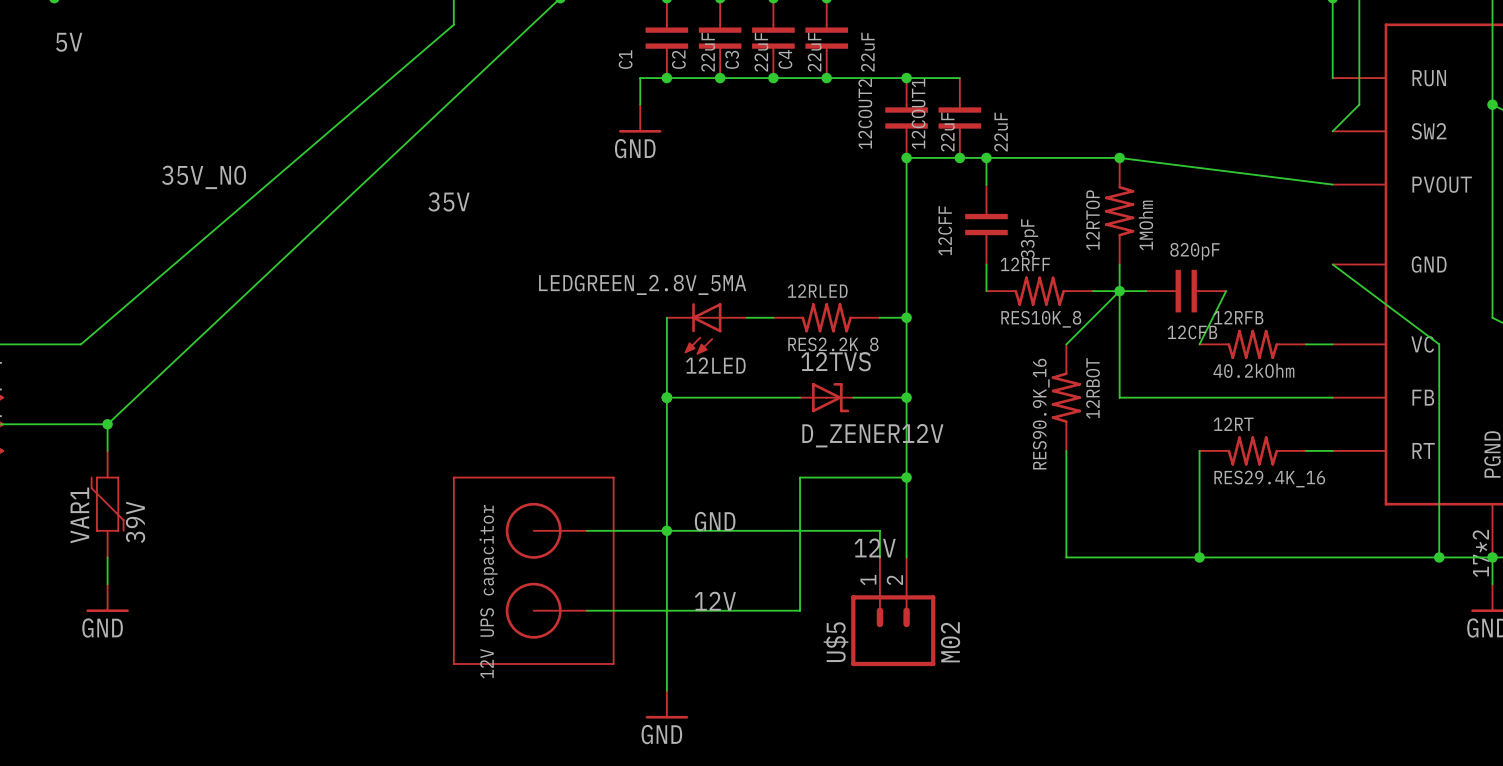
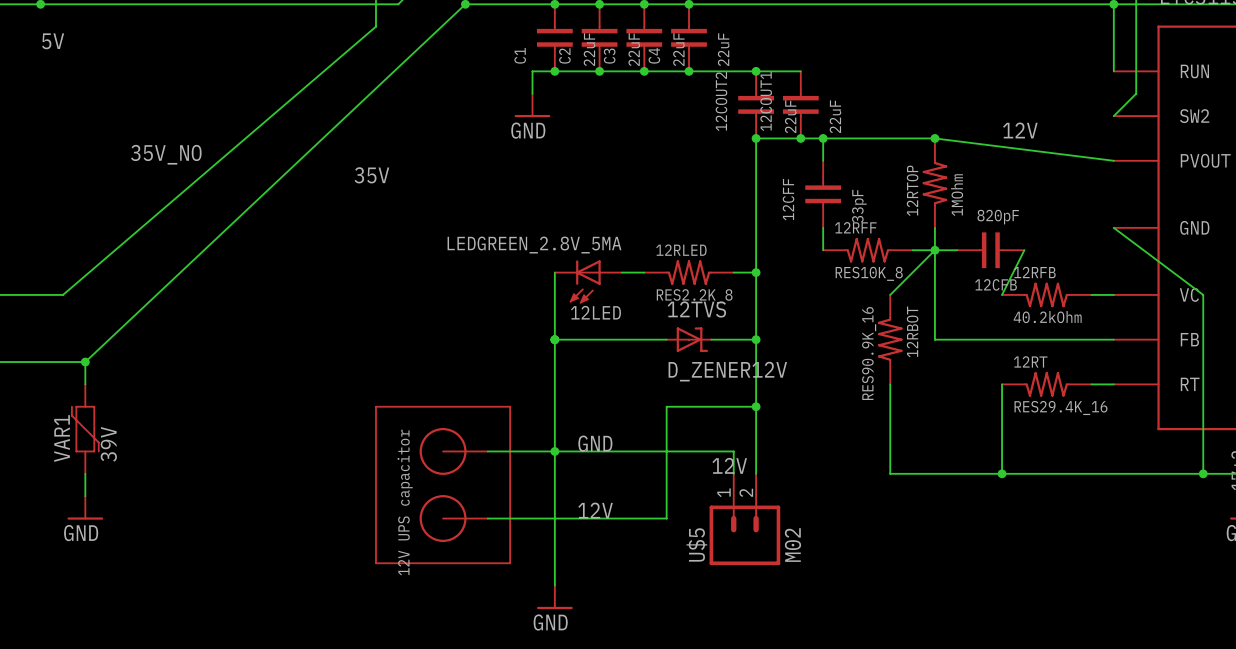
label: none -> 12V (1020, 130)

